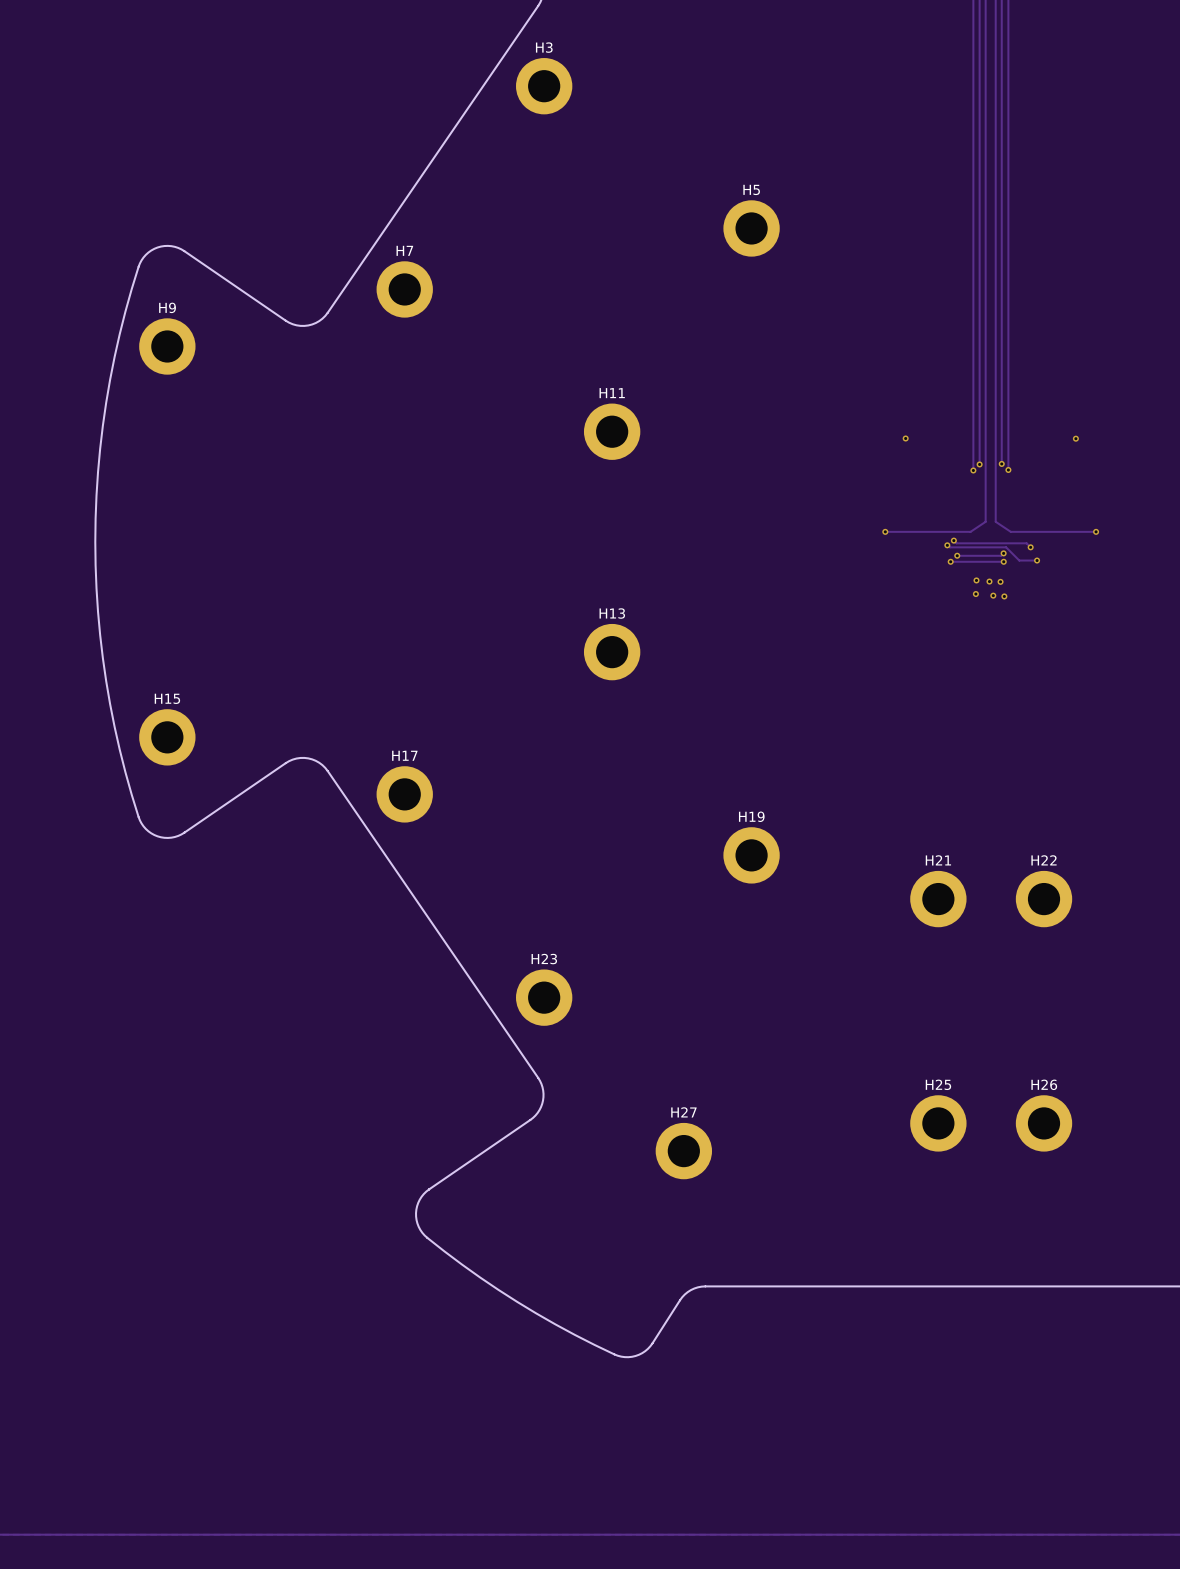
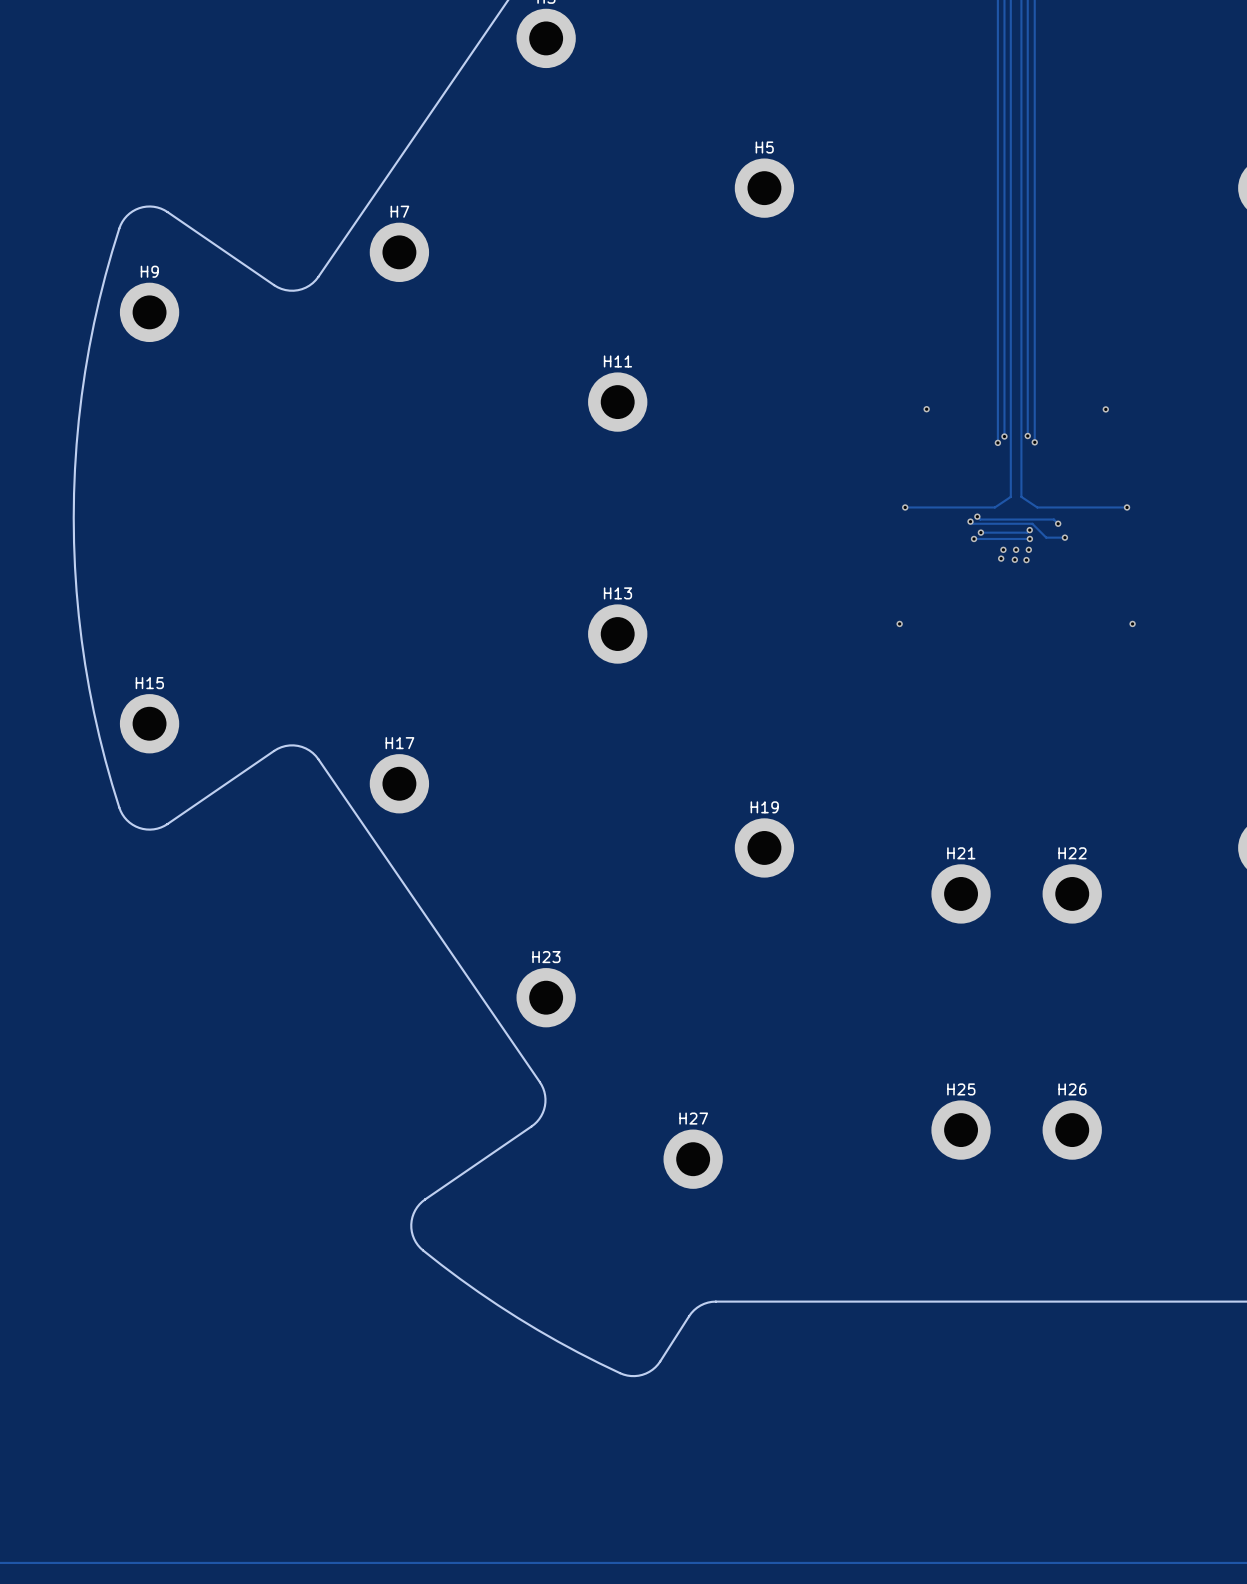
via: none -> (1003, 549)
via: none -> (1016, 549)
via: none -> (1028, 549)
via: (975, 594) -> none
via: (993, 595) -> none
via: (1004, 596) -> none
via: none -> (899, 623)
via: none -> (1132, 623)

